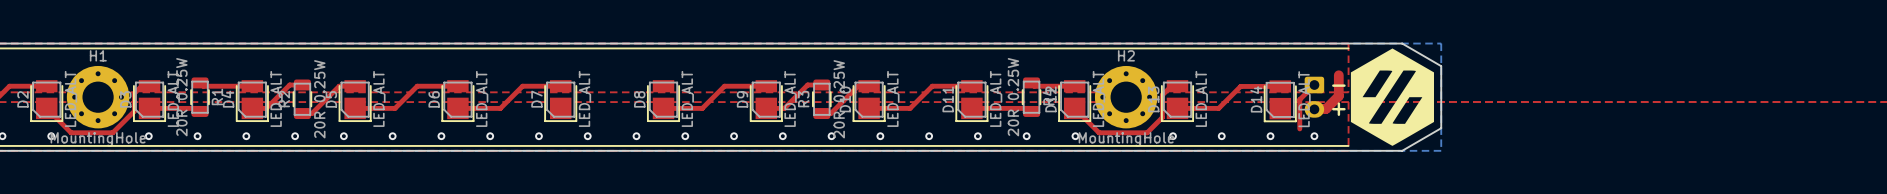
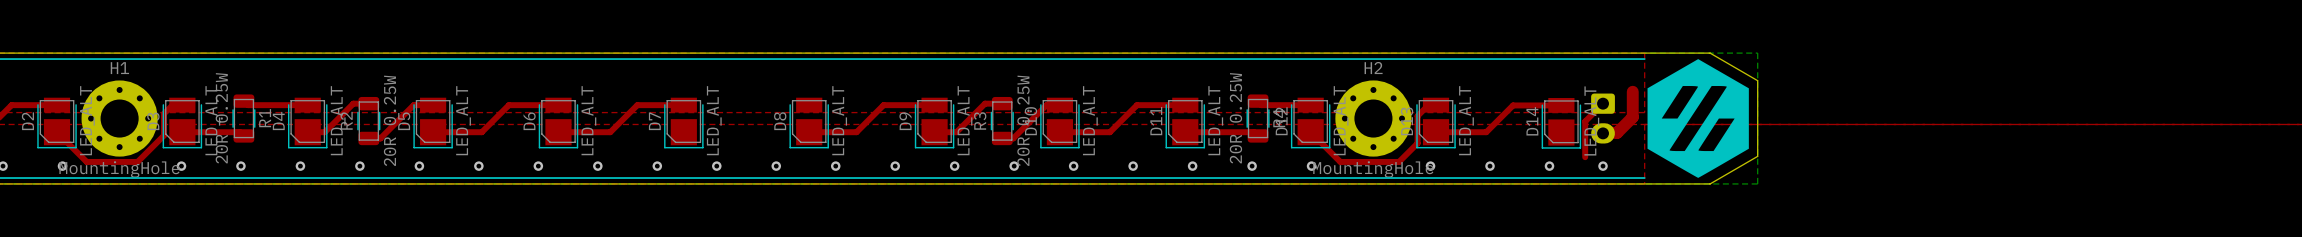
text: - (1338, 85) -> none
text: + (1338, 109) -> none

